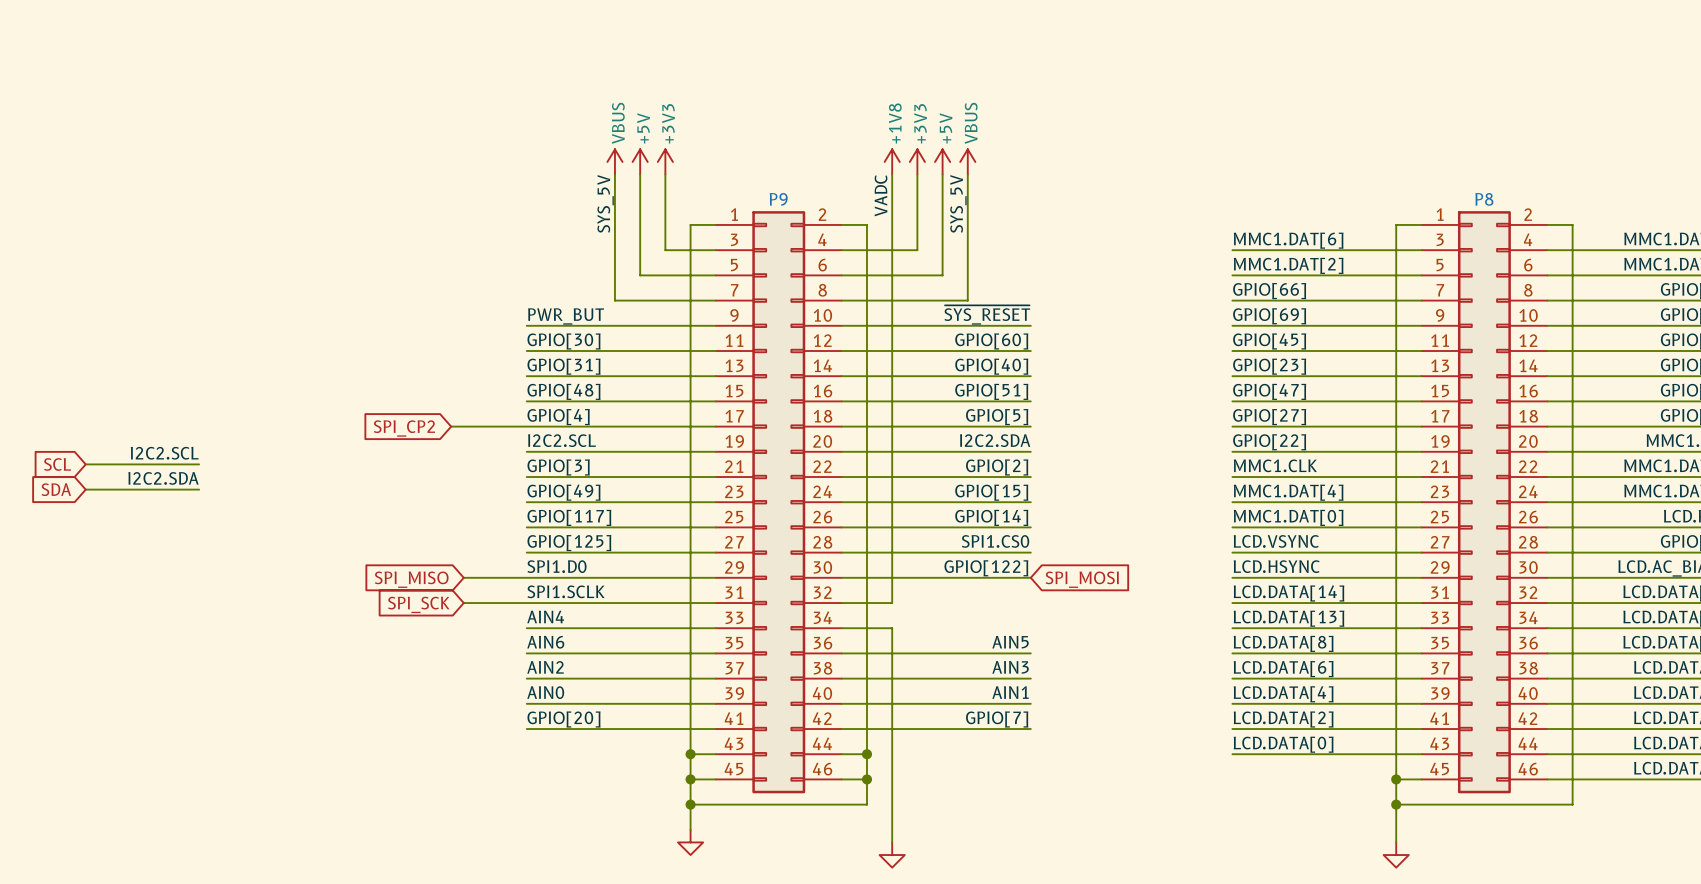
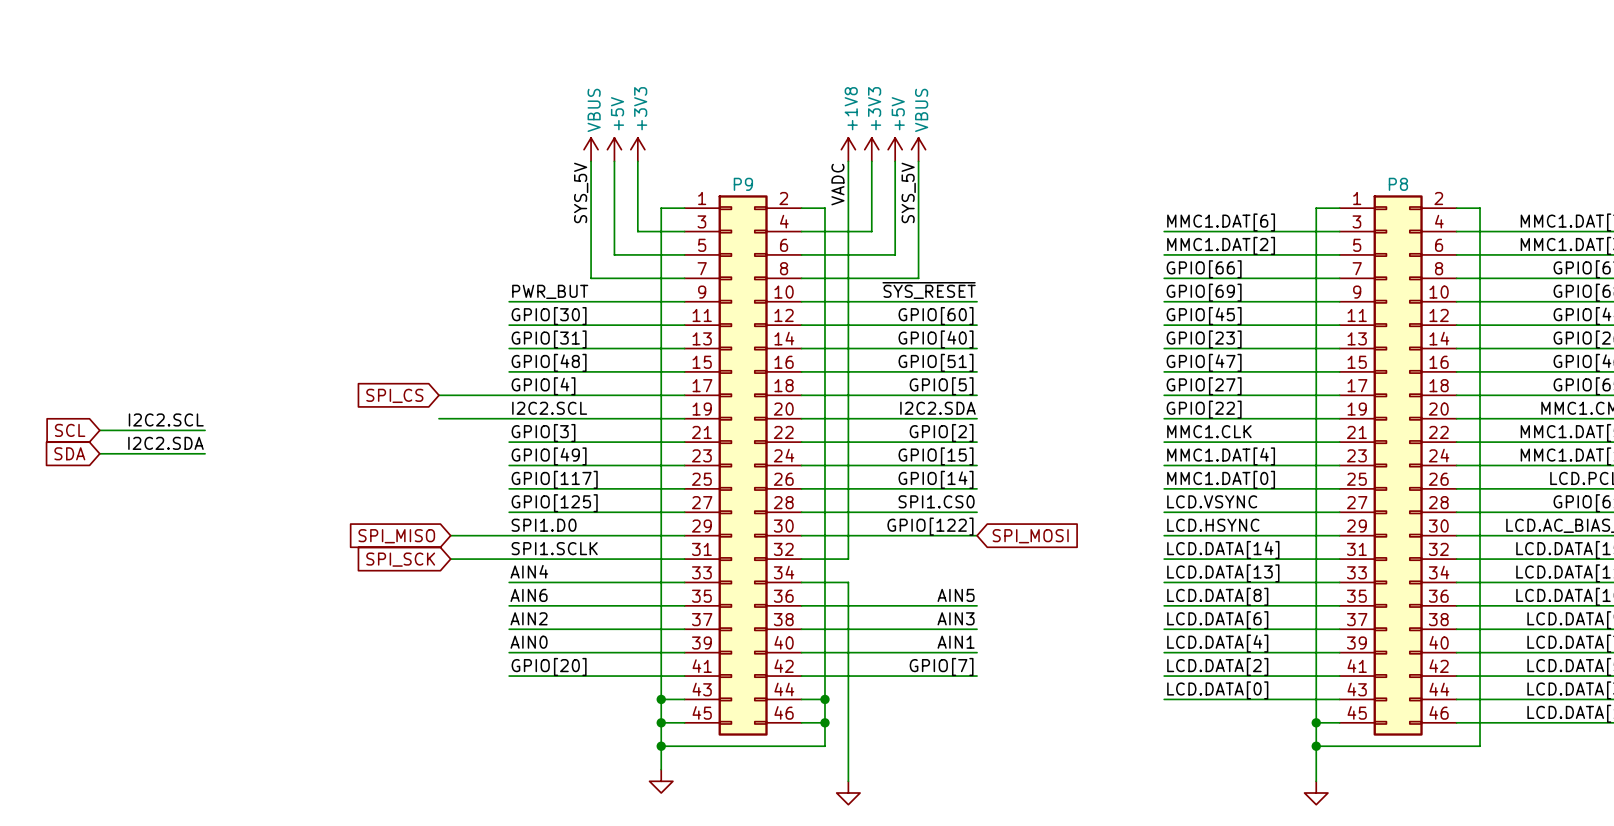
global label: SPI_CP2 (404, 428) -> SPI_CS (394, 395)
wire: none -> (438, 418) (509, 418)

